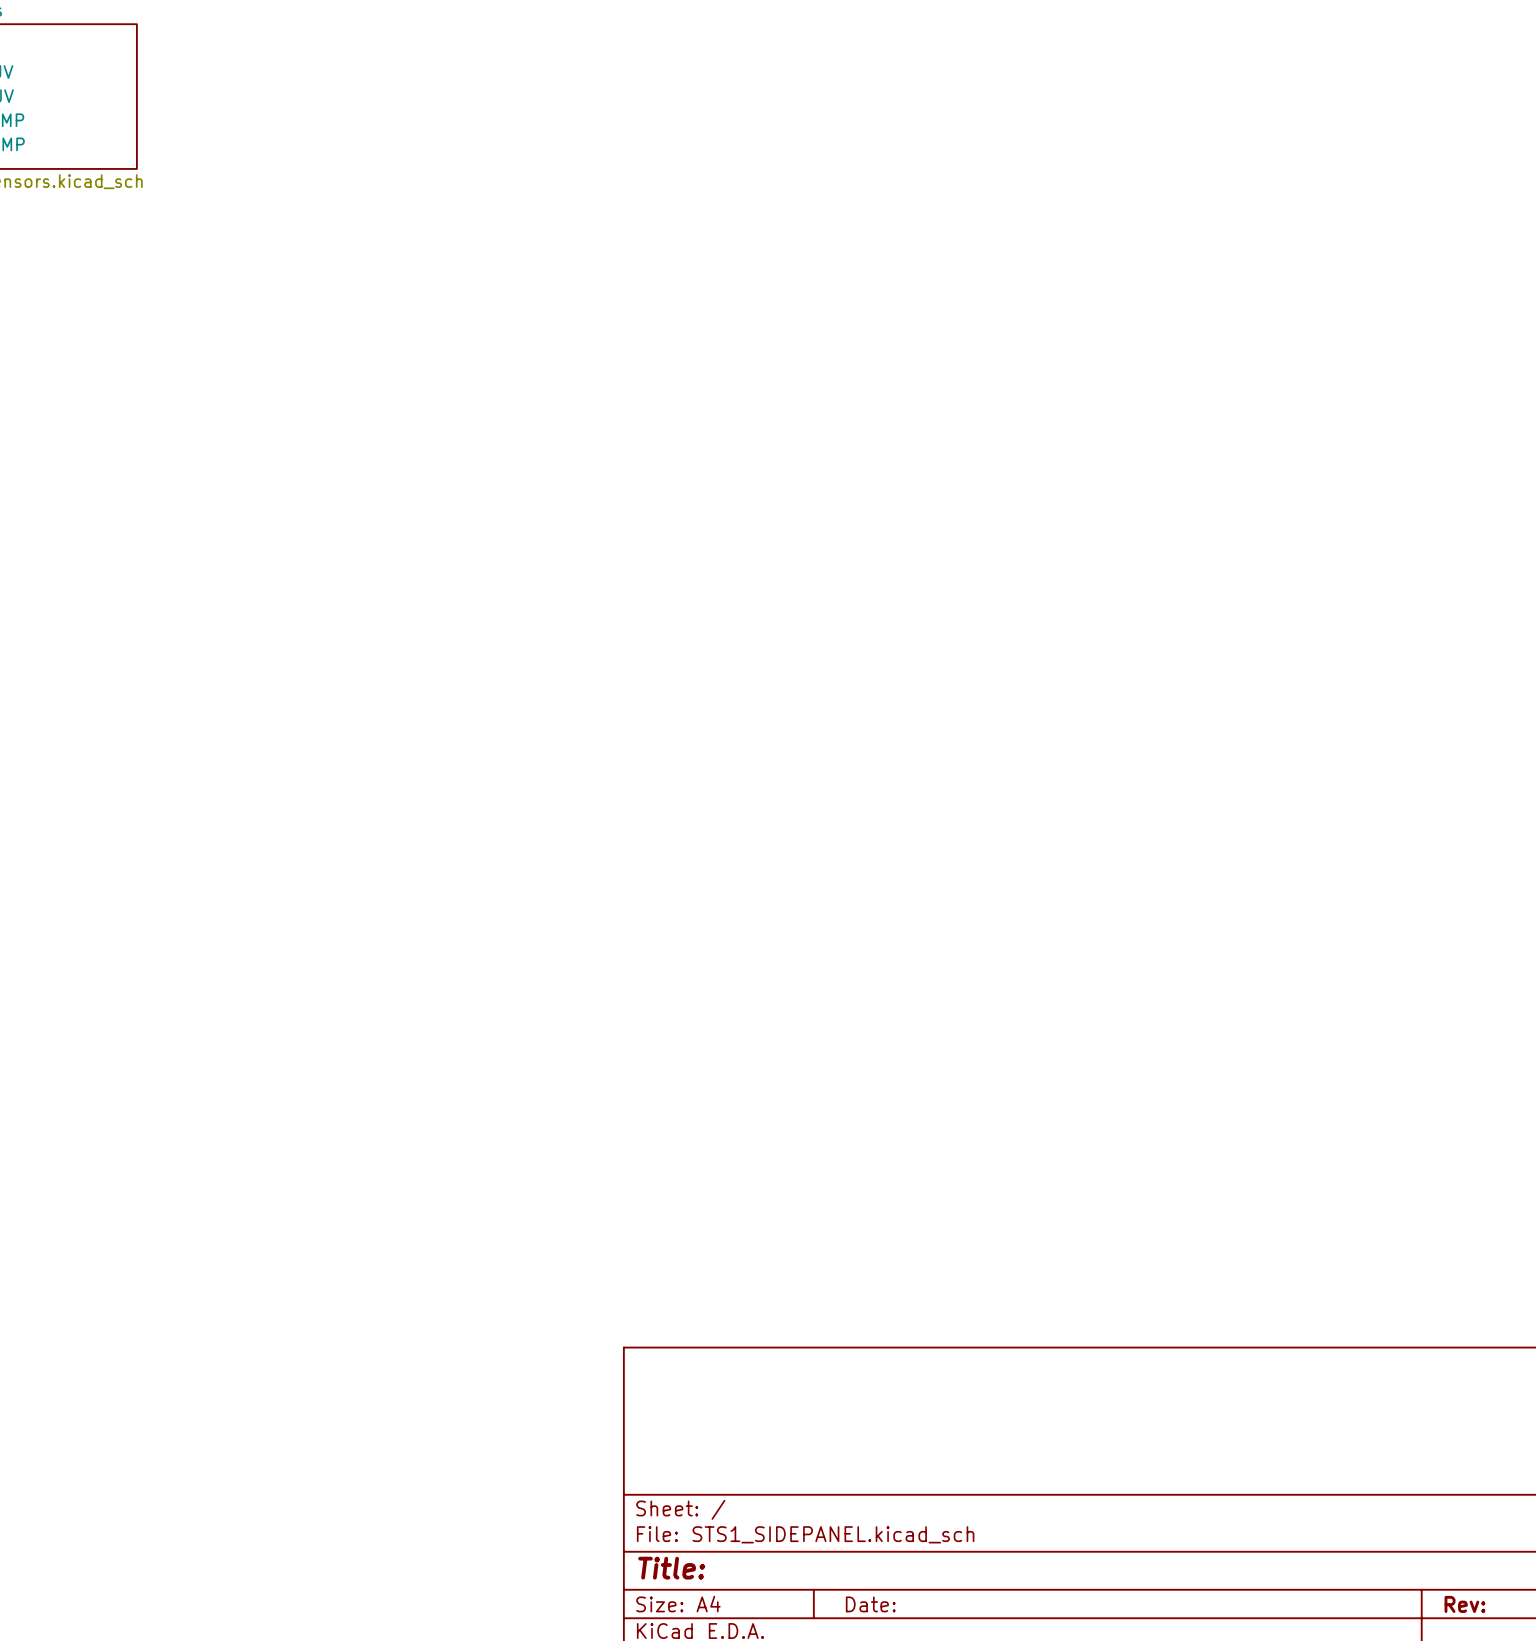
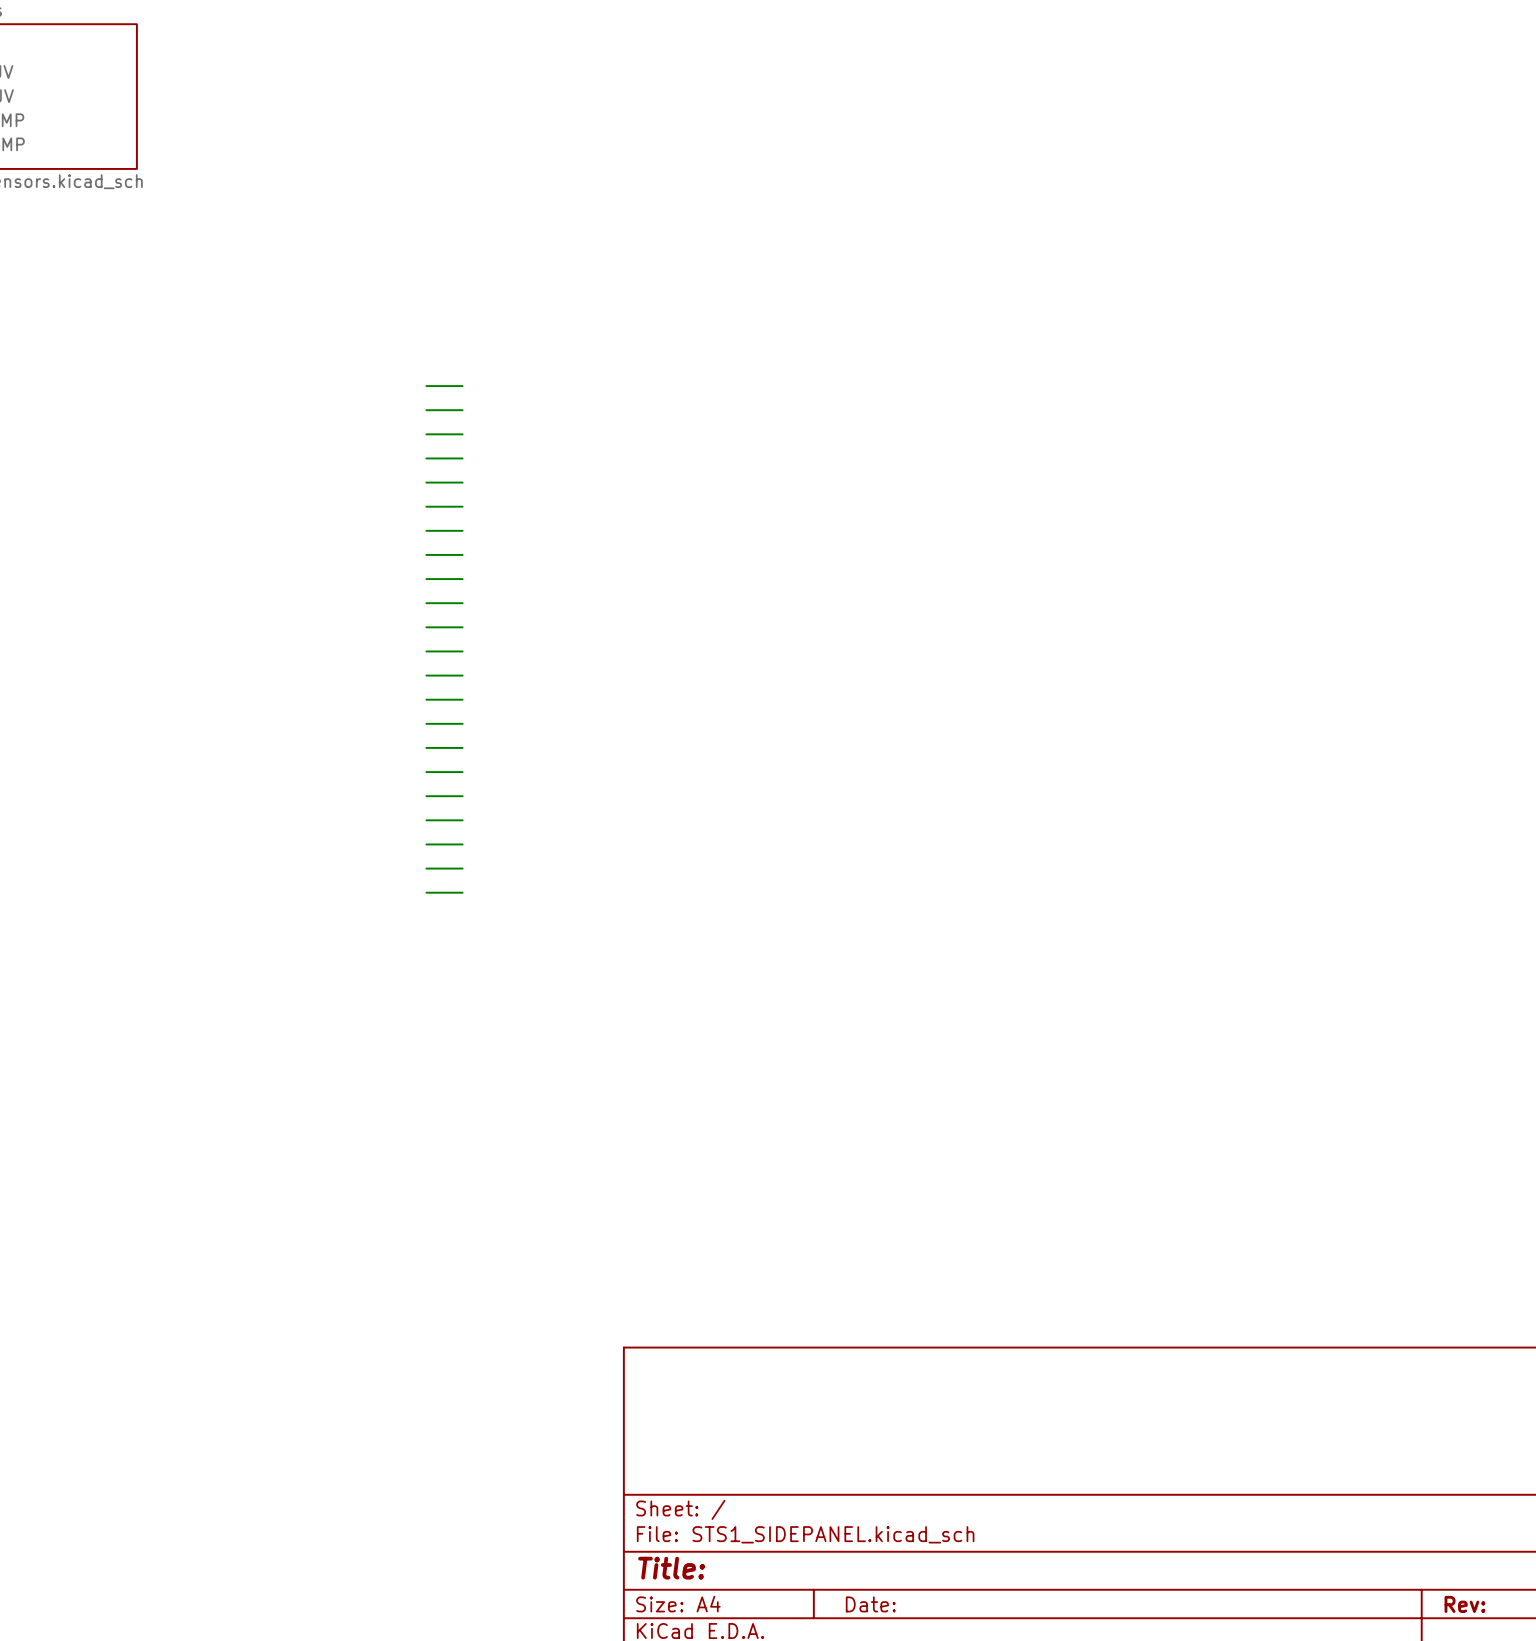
wire: none -> (426, 386) (462, 386)
wire: none -> (426, 410) (462, 410)
wire: none -> (426, 434) (462, 434)
wire: none -> (426, 458) (462, 458)
wire: none -> (426, 482) (462, 482)
wire: none -> (426, 506) (462, 506)
wire: none -> (426, 530) (462, 530)
wire: none -> (426, 554) (462, 554)
wire: none -> (426, 579) (462, 579)
wire: none -> (426, 603) (462, 603)
wire: none -> (426, 627) (462, 627)
wire: none -> (426, 651) (462, 651)
wire: none -> (426, 675) (462, 675)
wire: none -> (426, 699) (462, 699)
wire: none -> (426, 723) (462, 723)
wire: none -> (426, 747) (462, 747)
wire: none -> (426, 772) (462, 772)
wire: none -> (426, 796) (462, 796)
wire: none -> (426, 820) (462, 820)
wire: none -> (426, 844) (462, 844)
wire: none -> (426, 868) (462, 868)
wire: none -> (426, 892) (462, 892)

